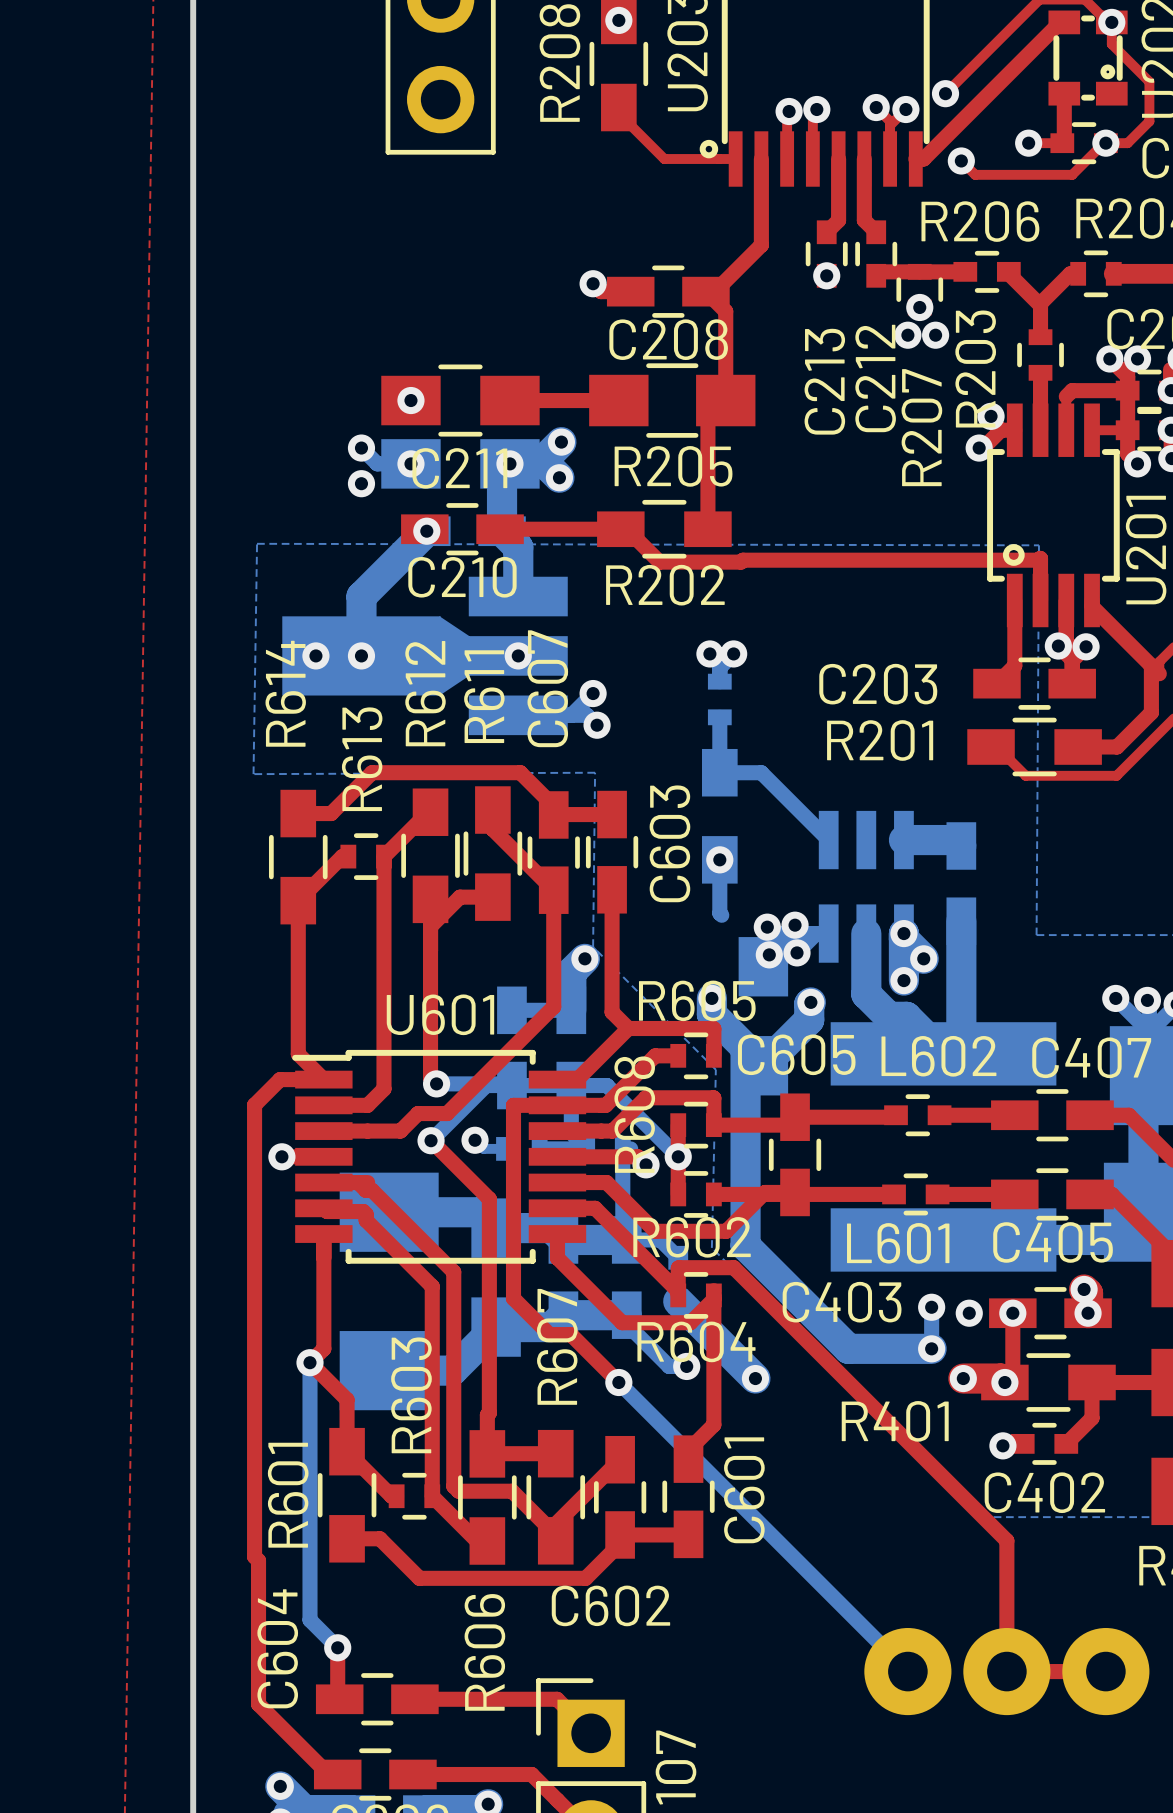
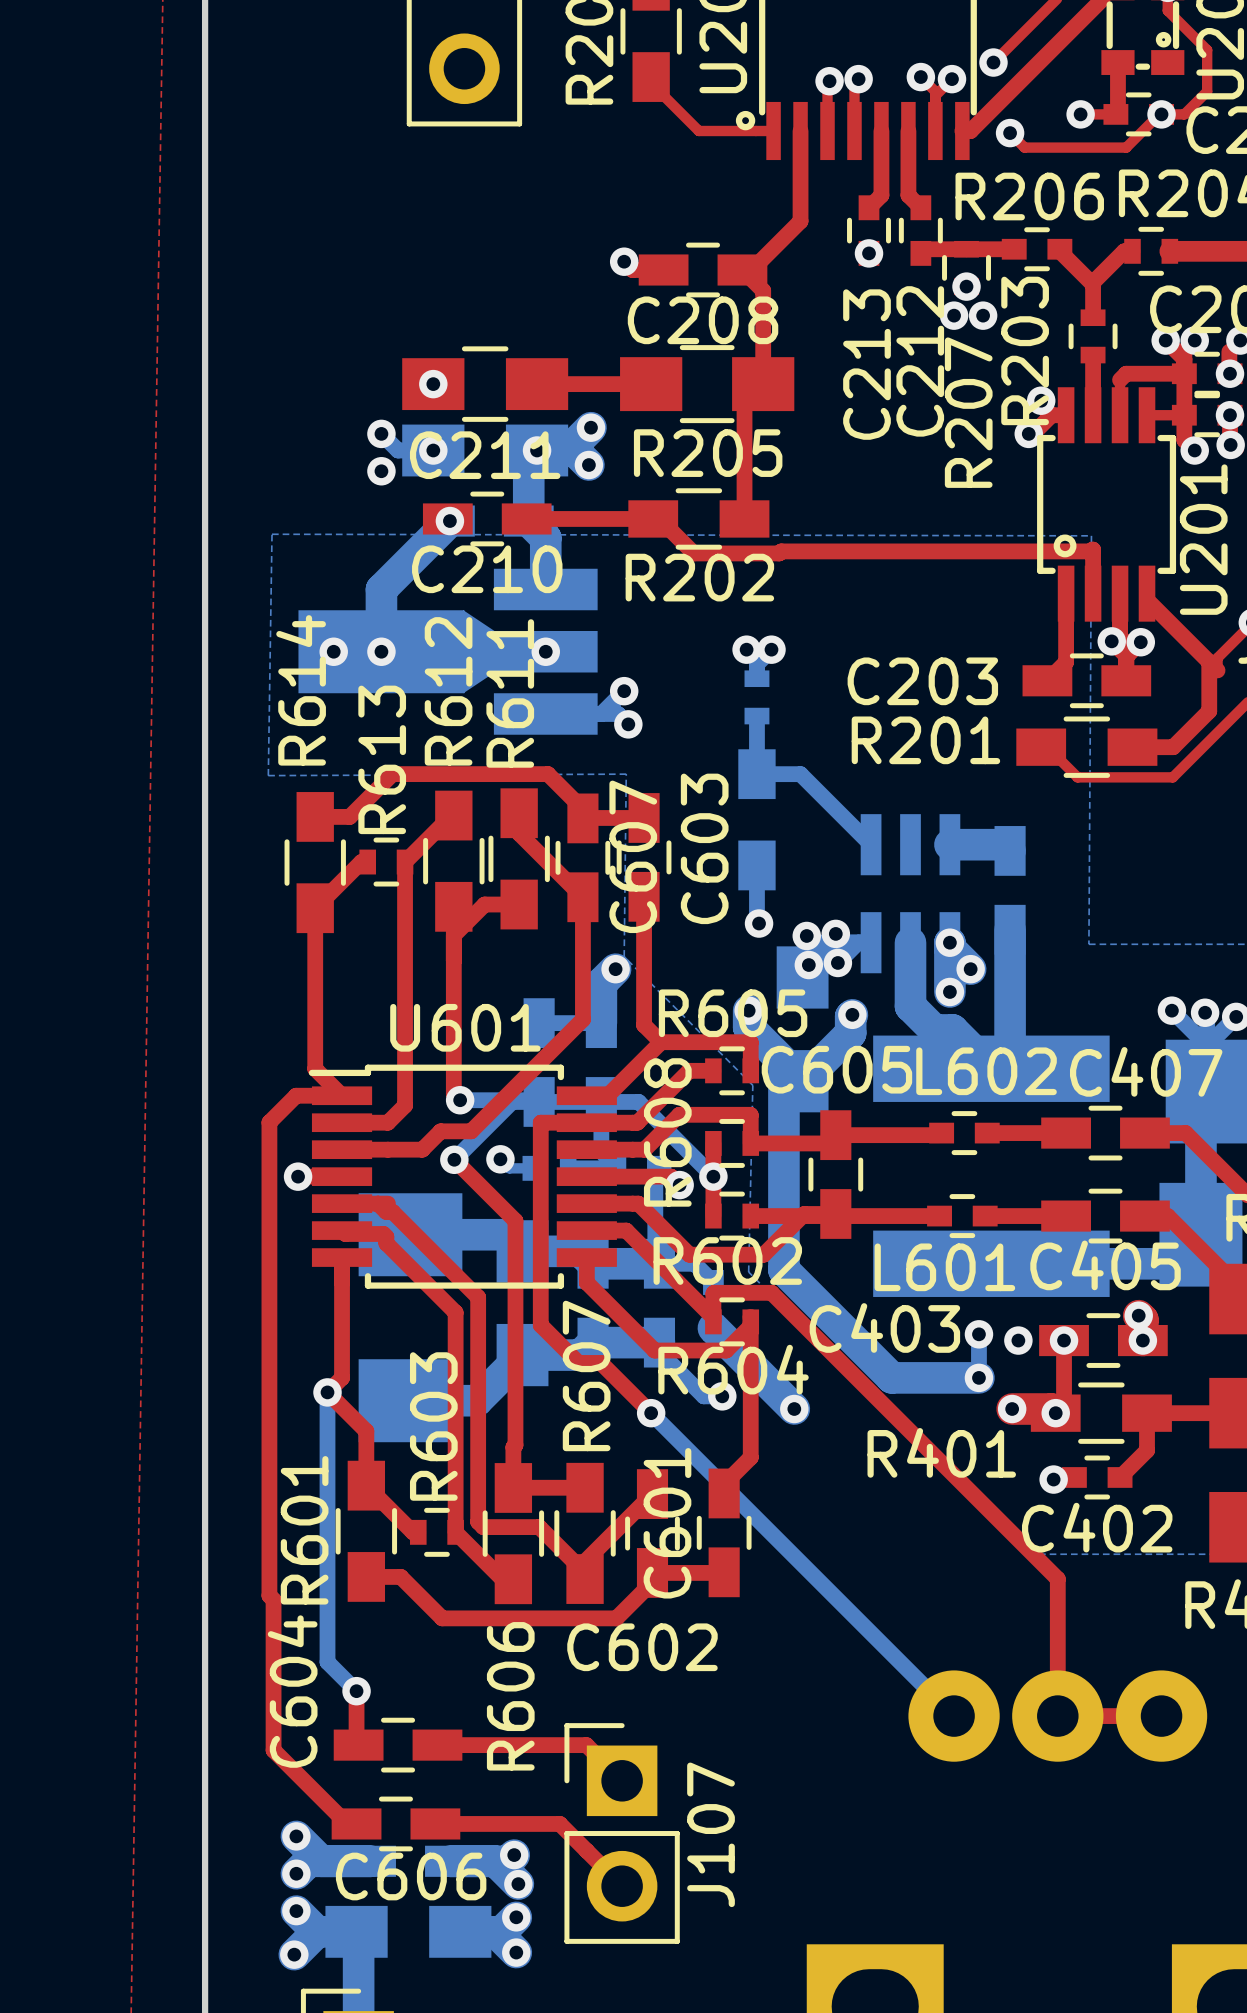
C607 name position: C607 (547, 688) -> C607 (633, 856)
via position: (719, 859) -> (759, 923)
C601 name position: C601 (744, 1490) -> C601 (667, 1523)

